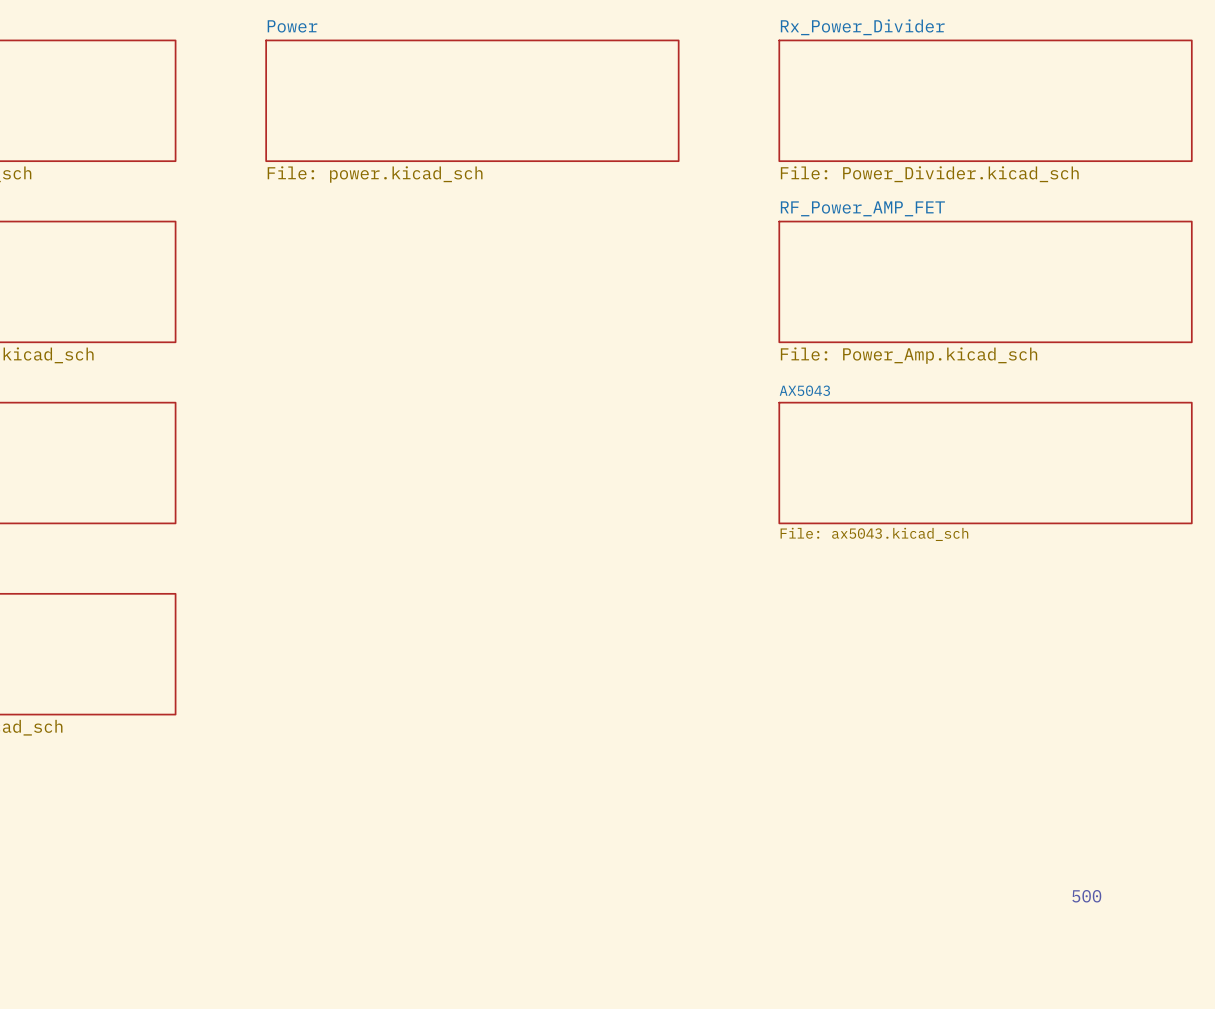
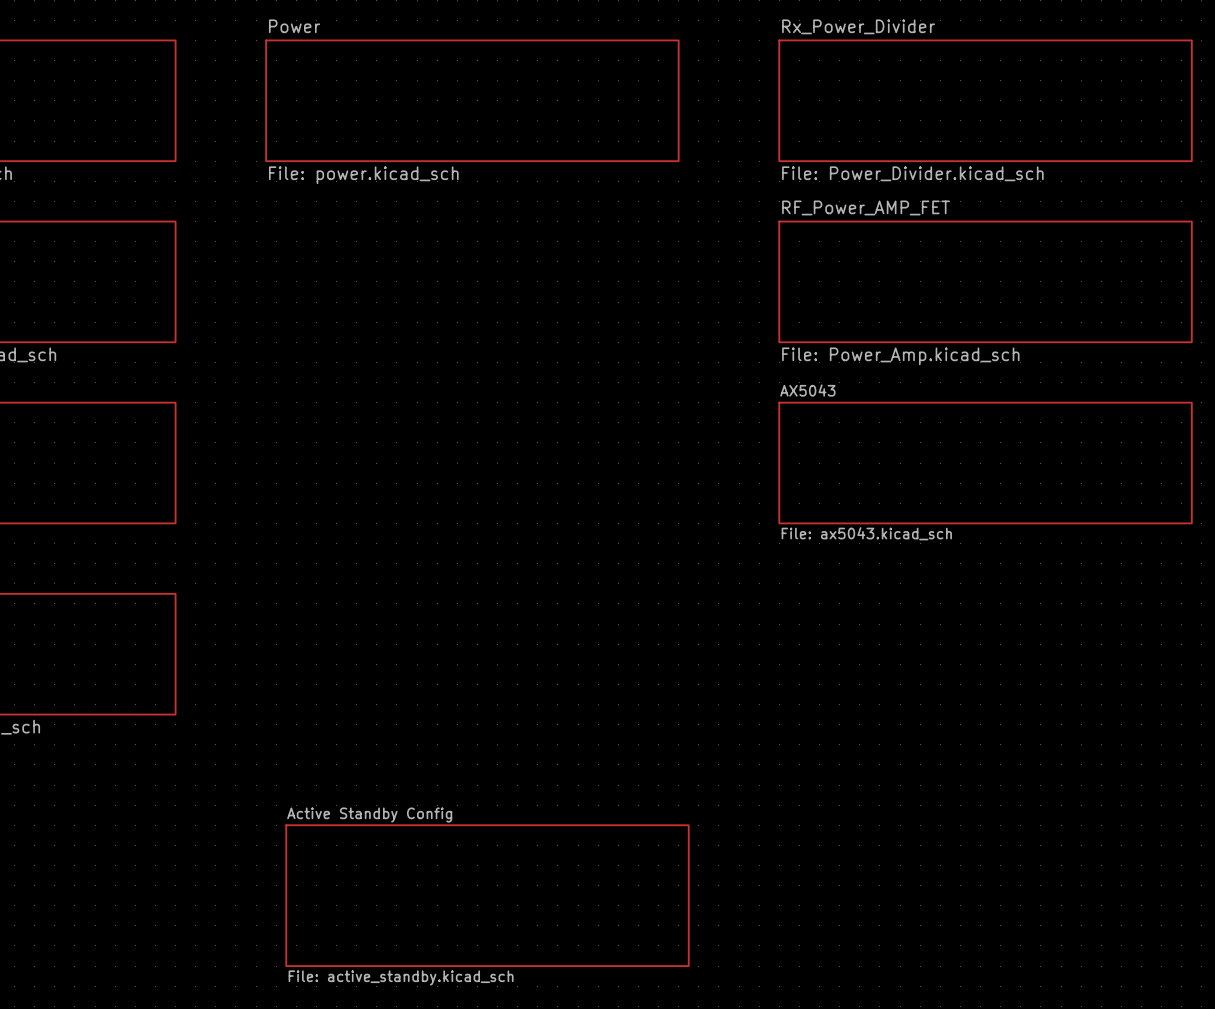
sheet Active Standby Config: none -> File: active_standby.kicad_sch (487, 895)
text: 500 (1086, 896) -> none

